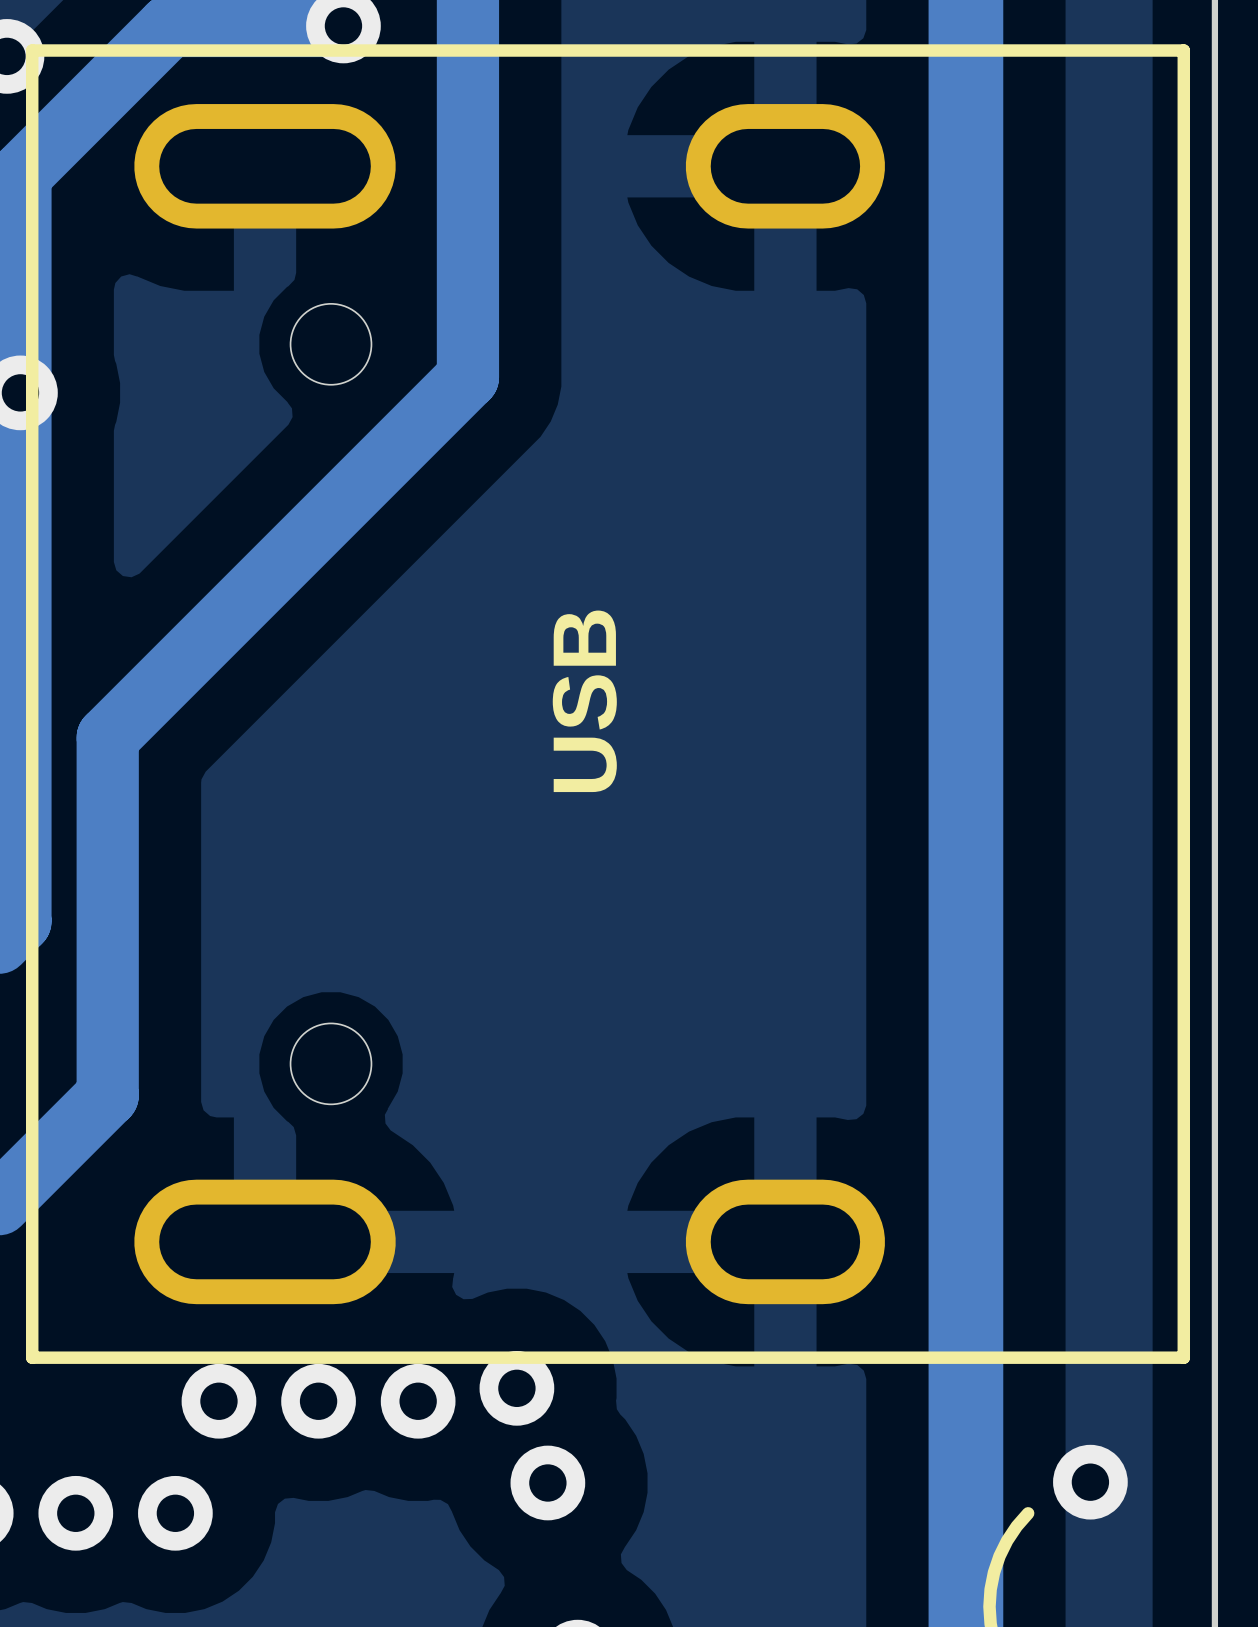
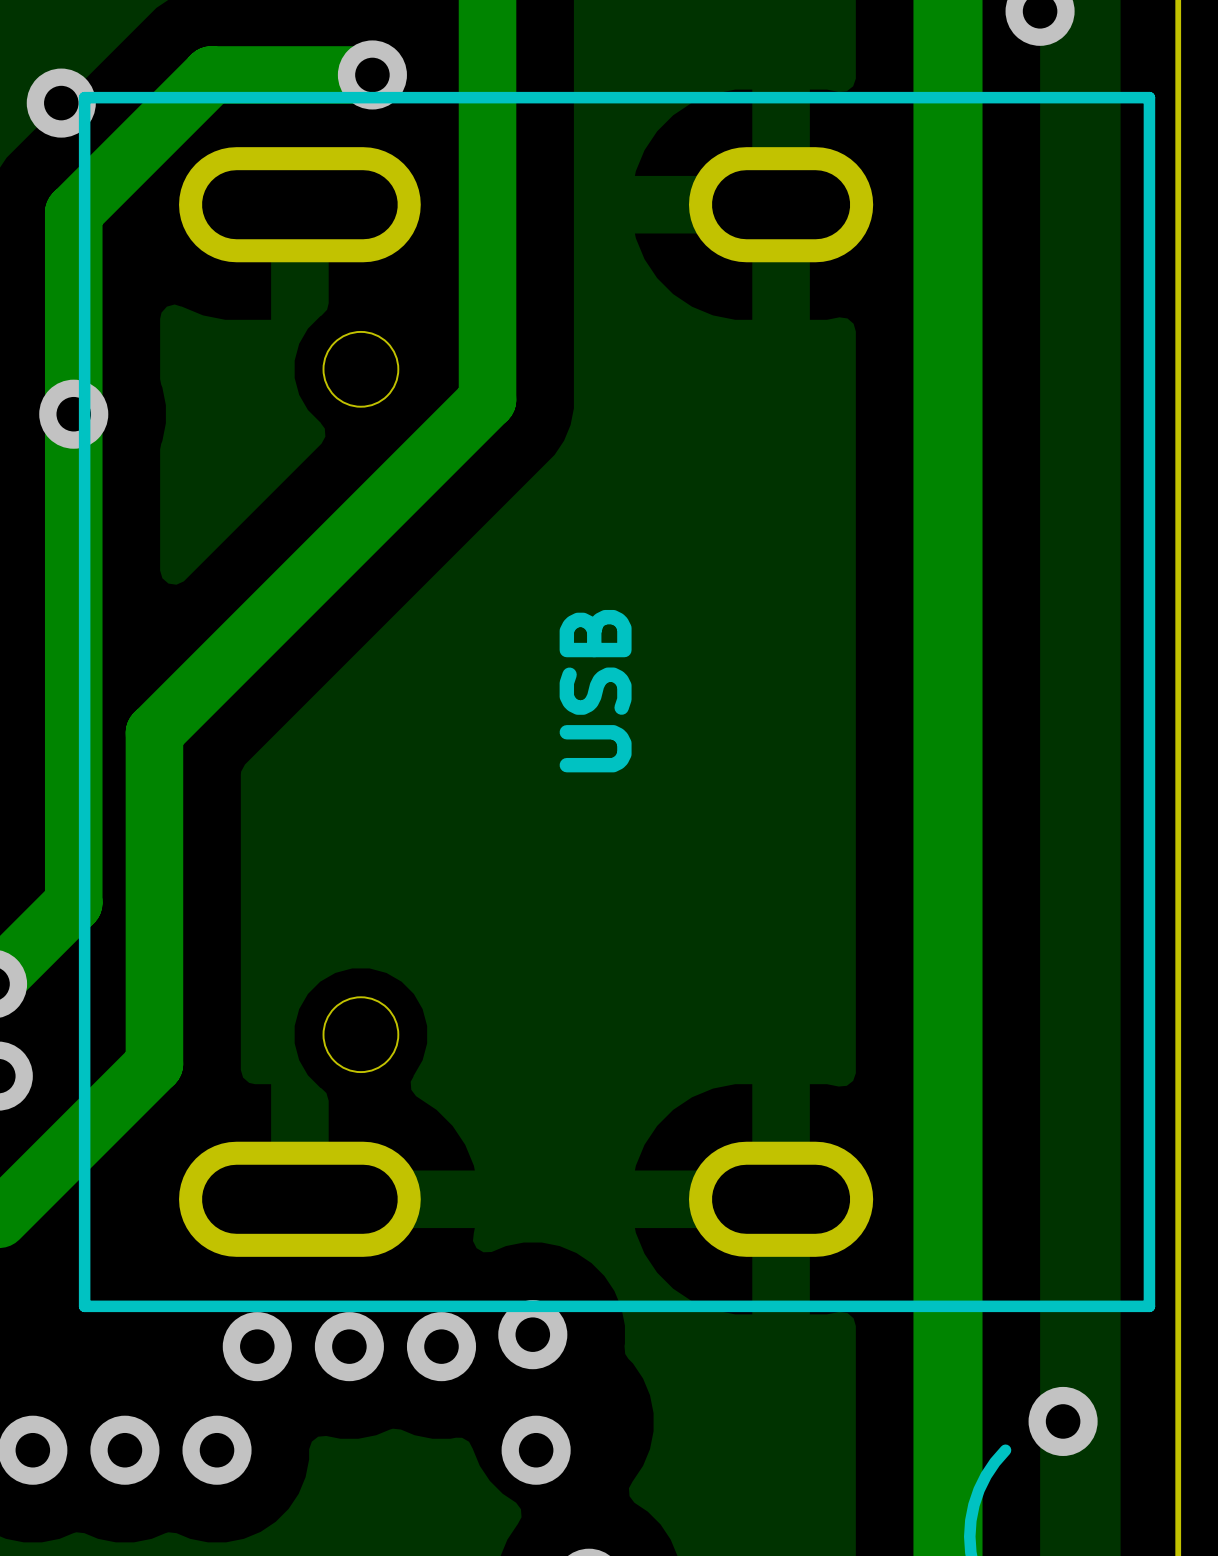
via position: (547, 1482) -> (536, 1450)

